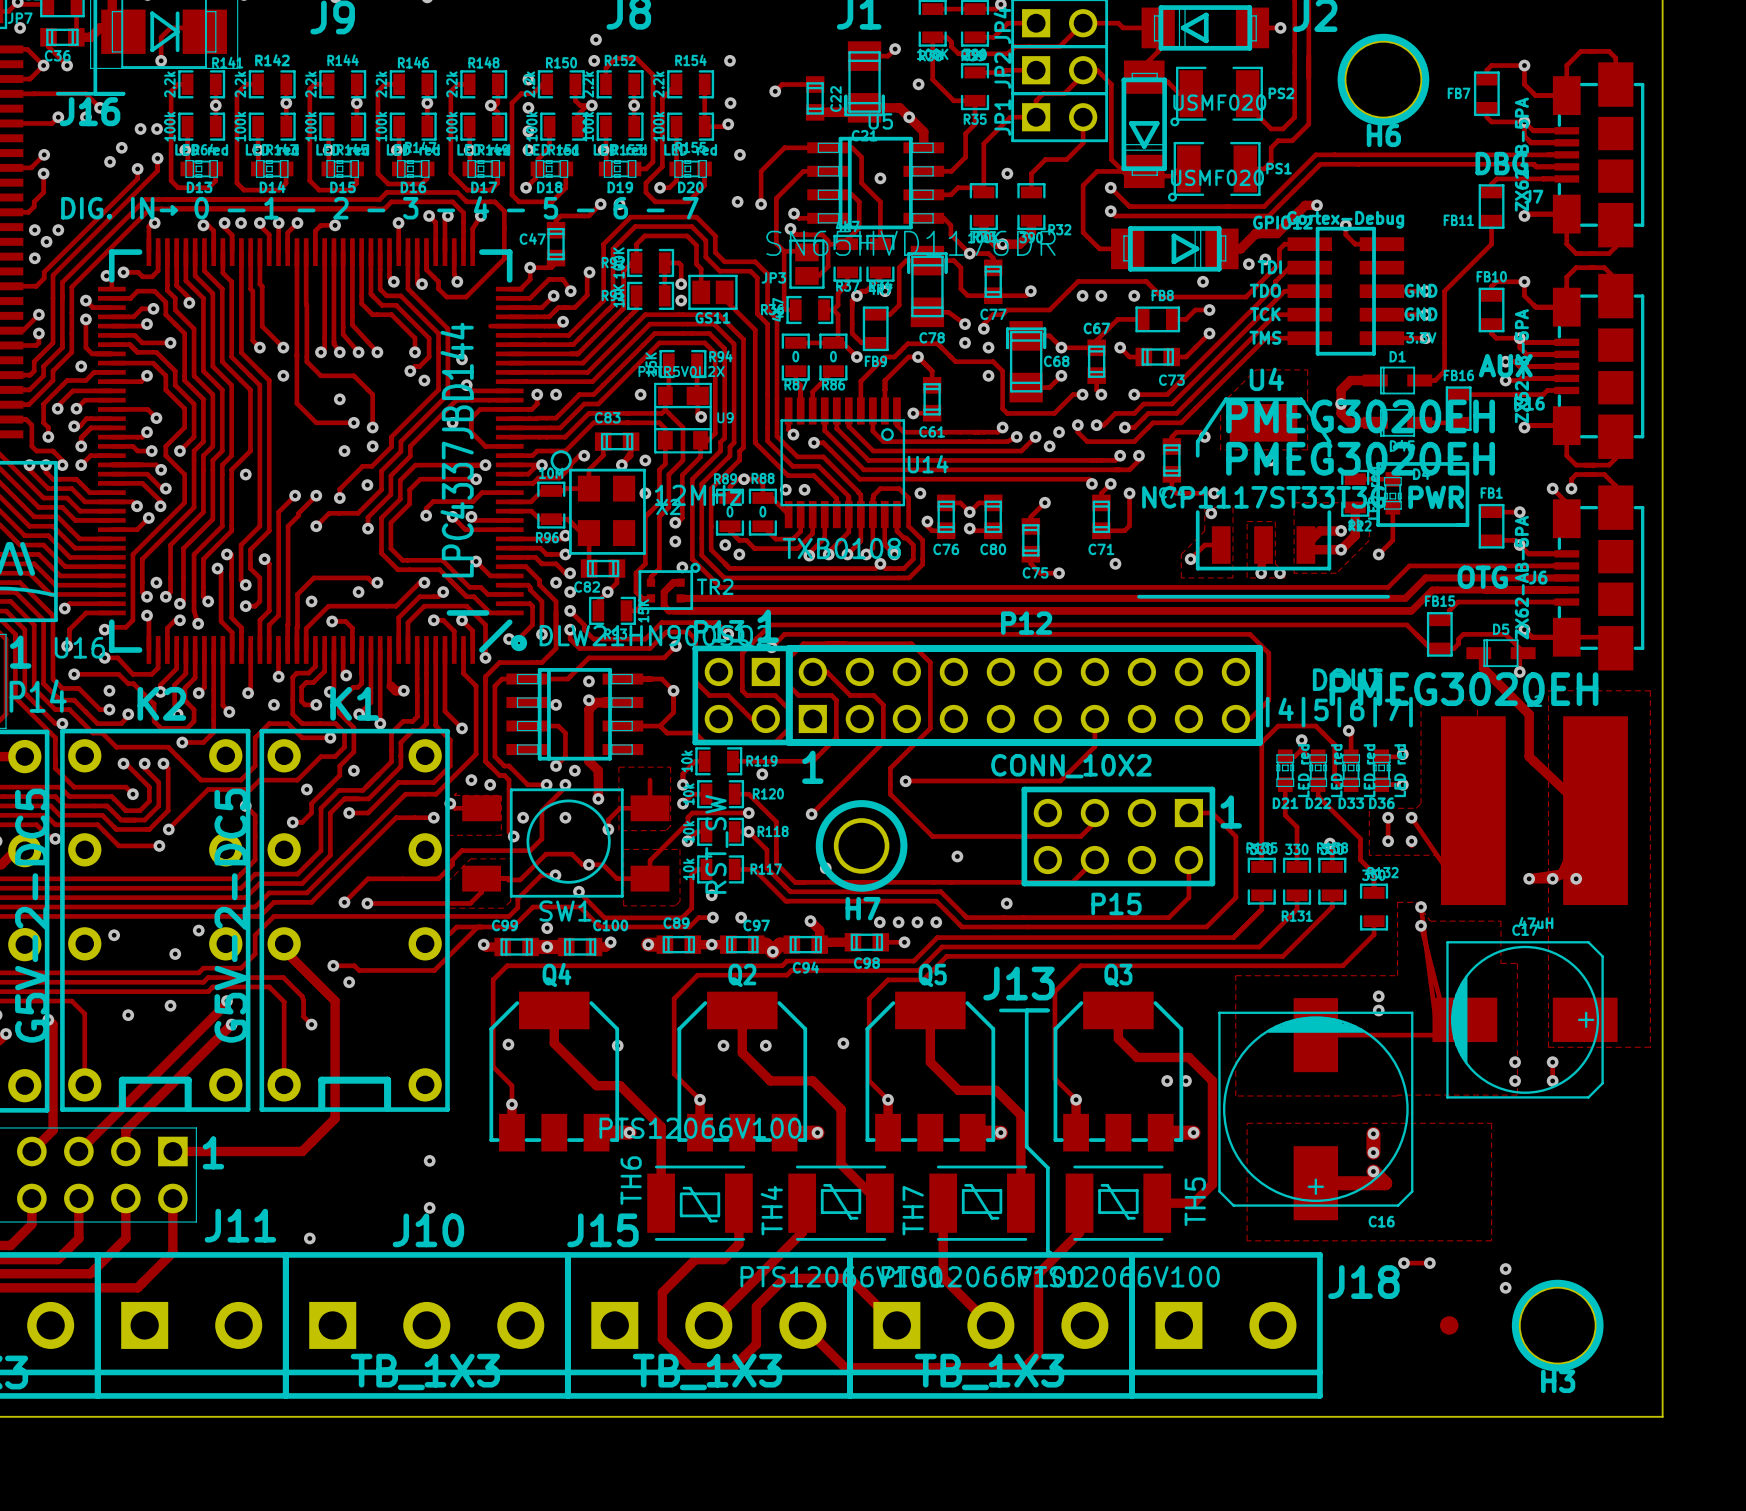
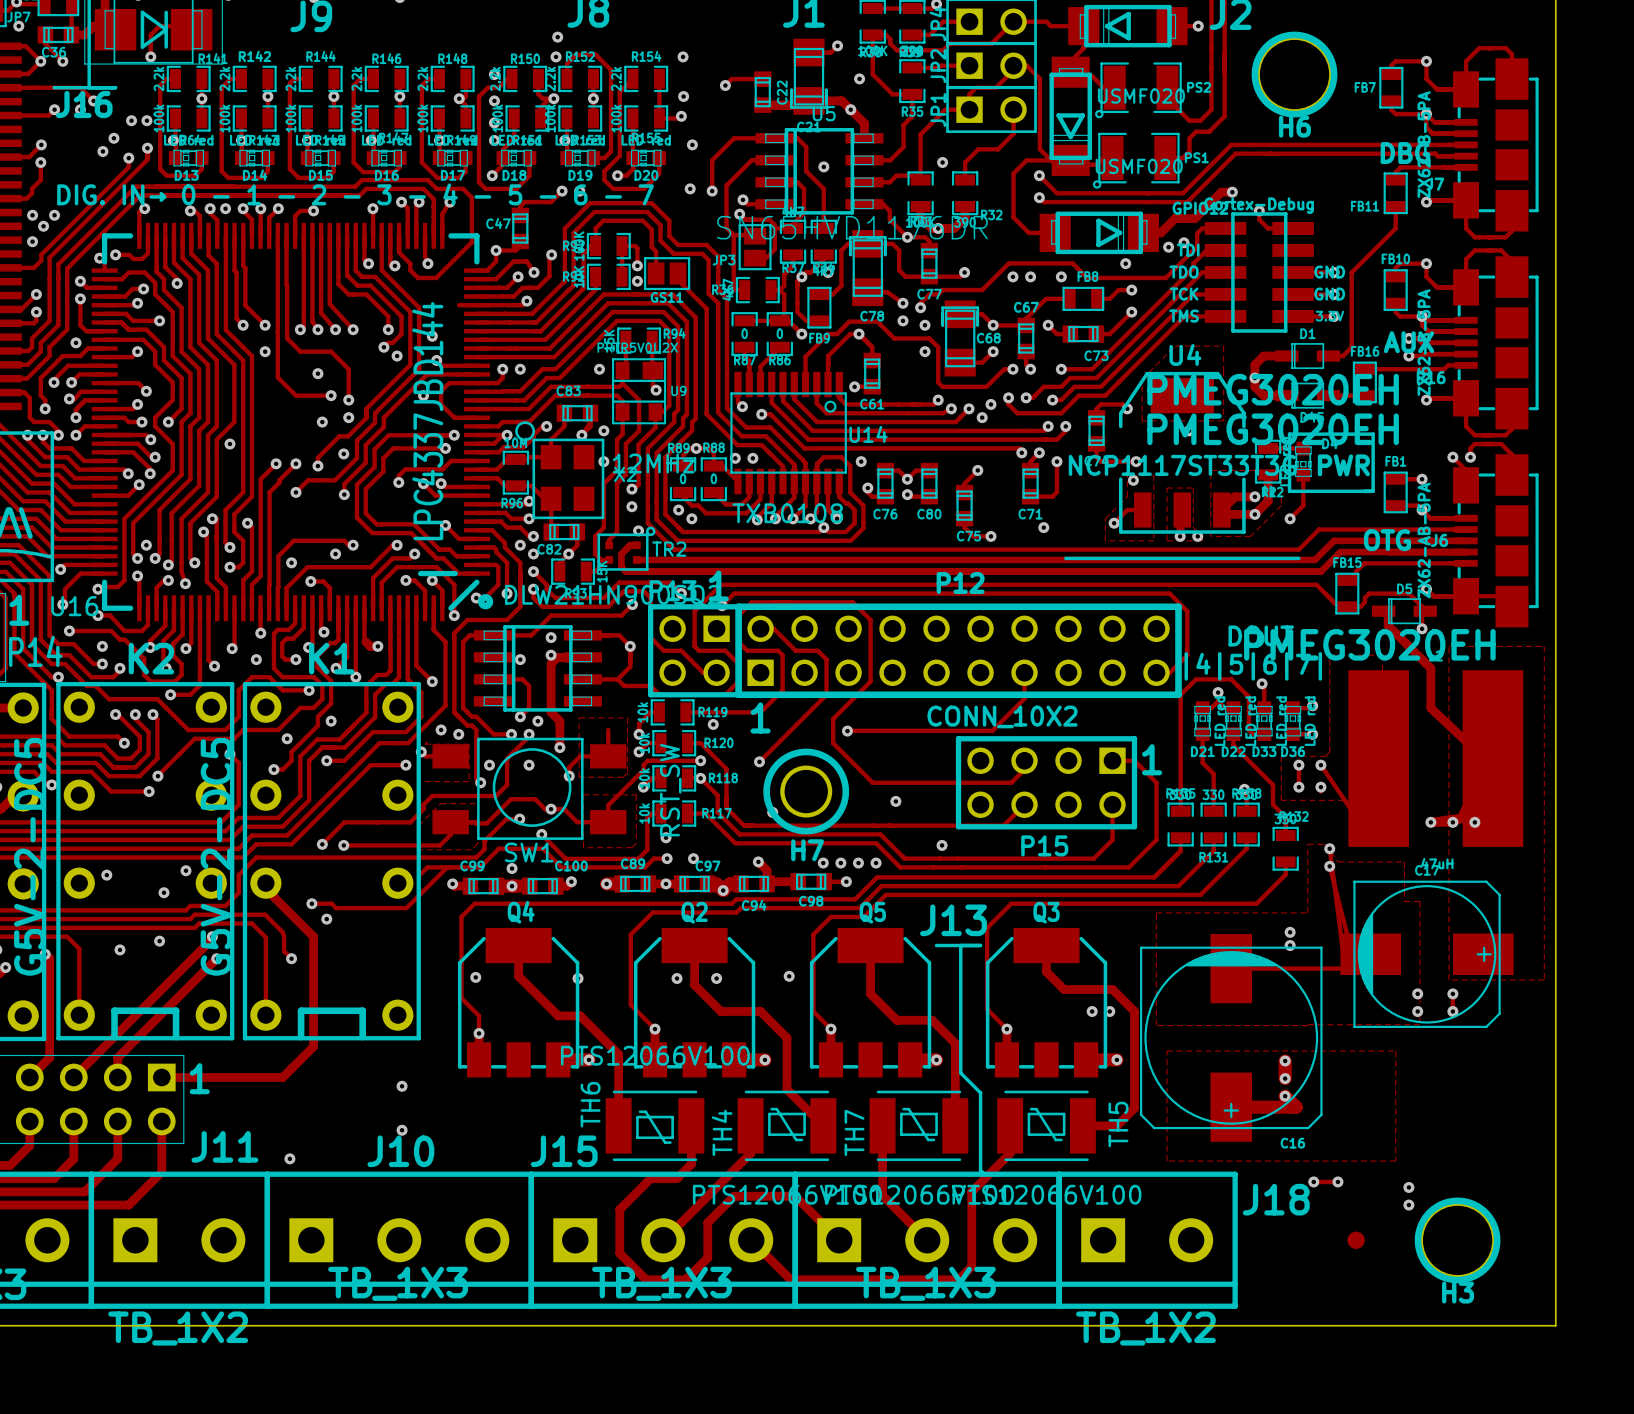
J11 value: none -> TB_1X2 (178, 1328)
J18 value: none -> TB_1X2 (1145, 1328)

